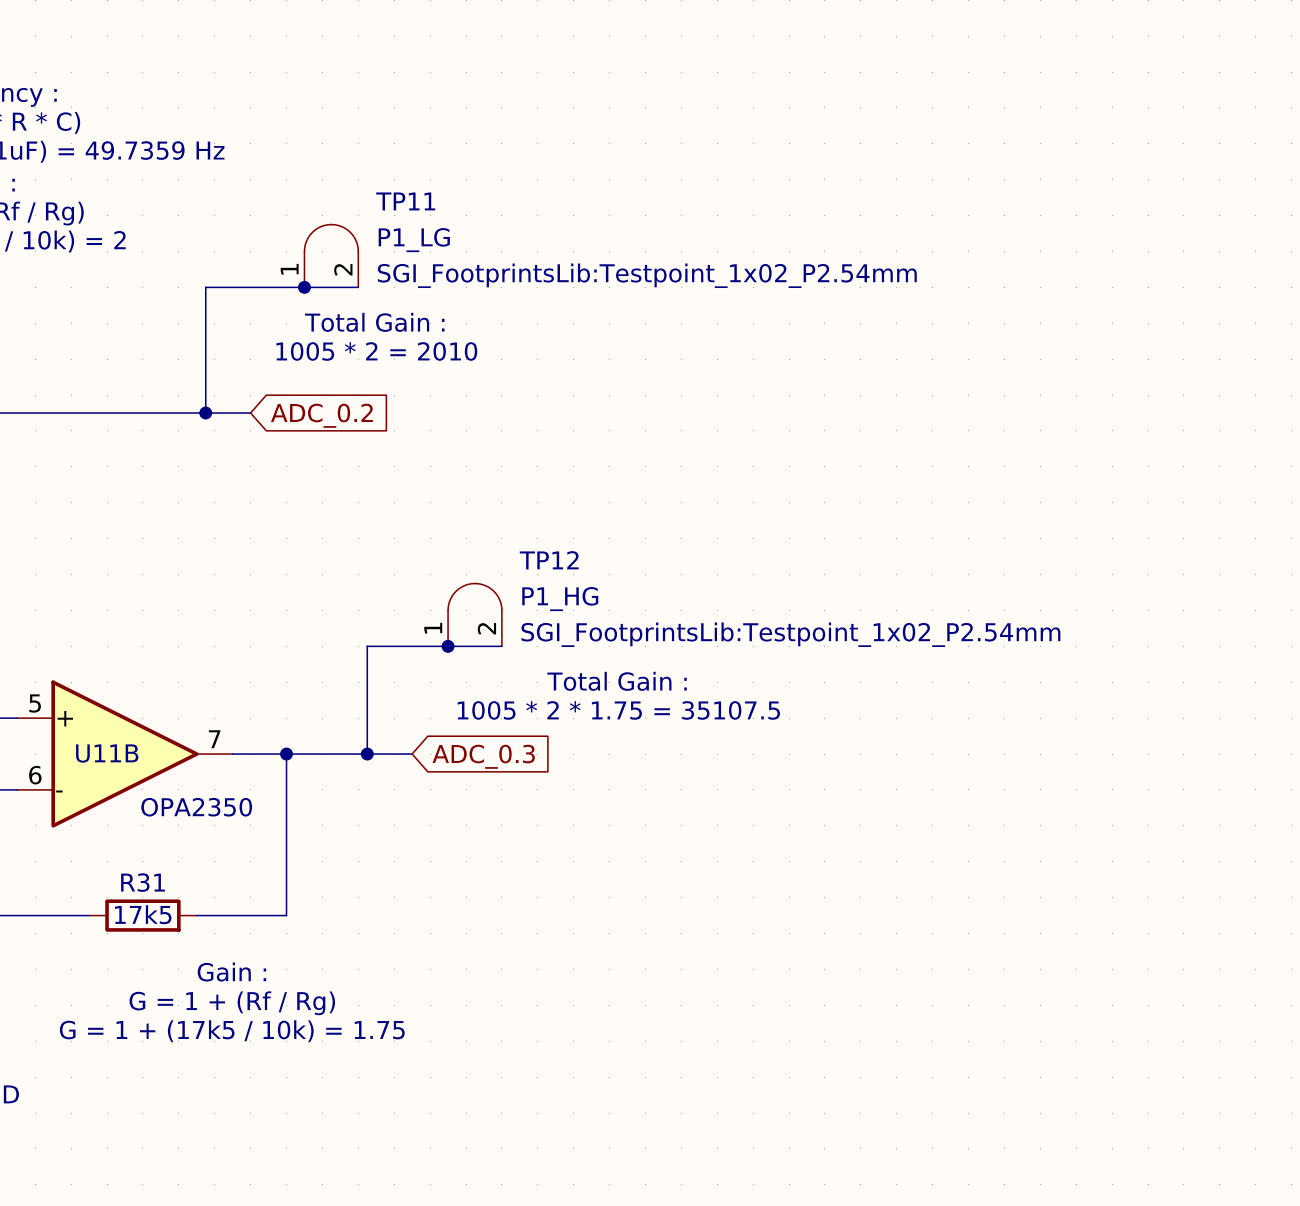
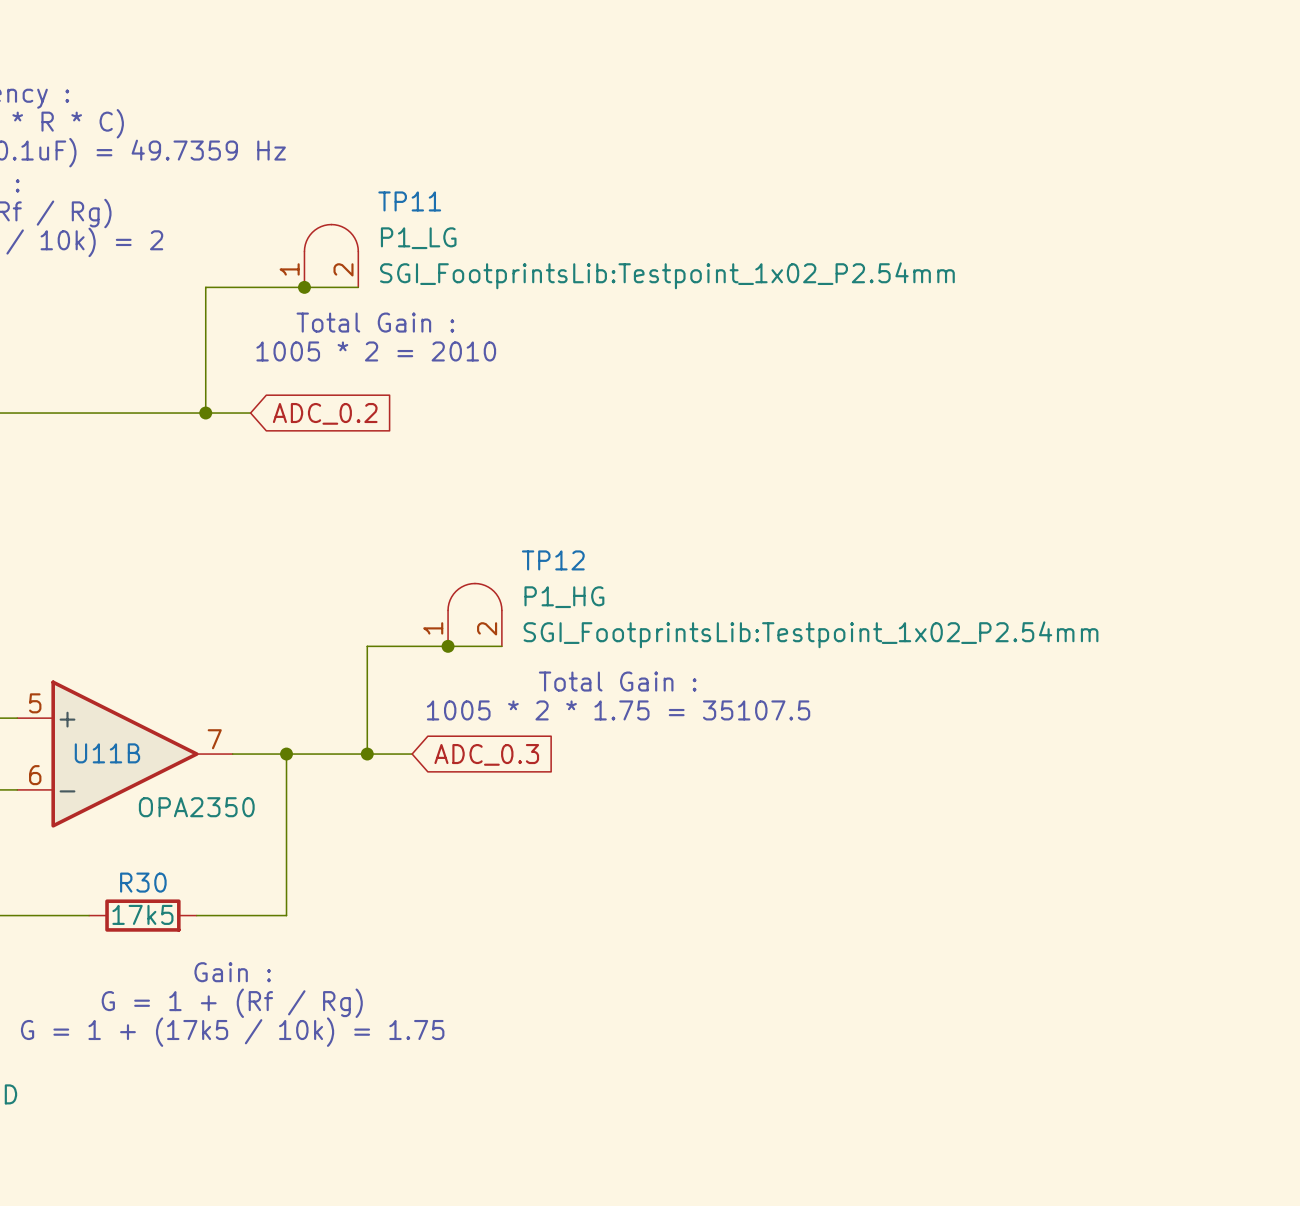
R31 name: R31 (143, 882) -> R30 (143, 882)

